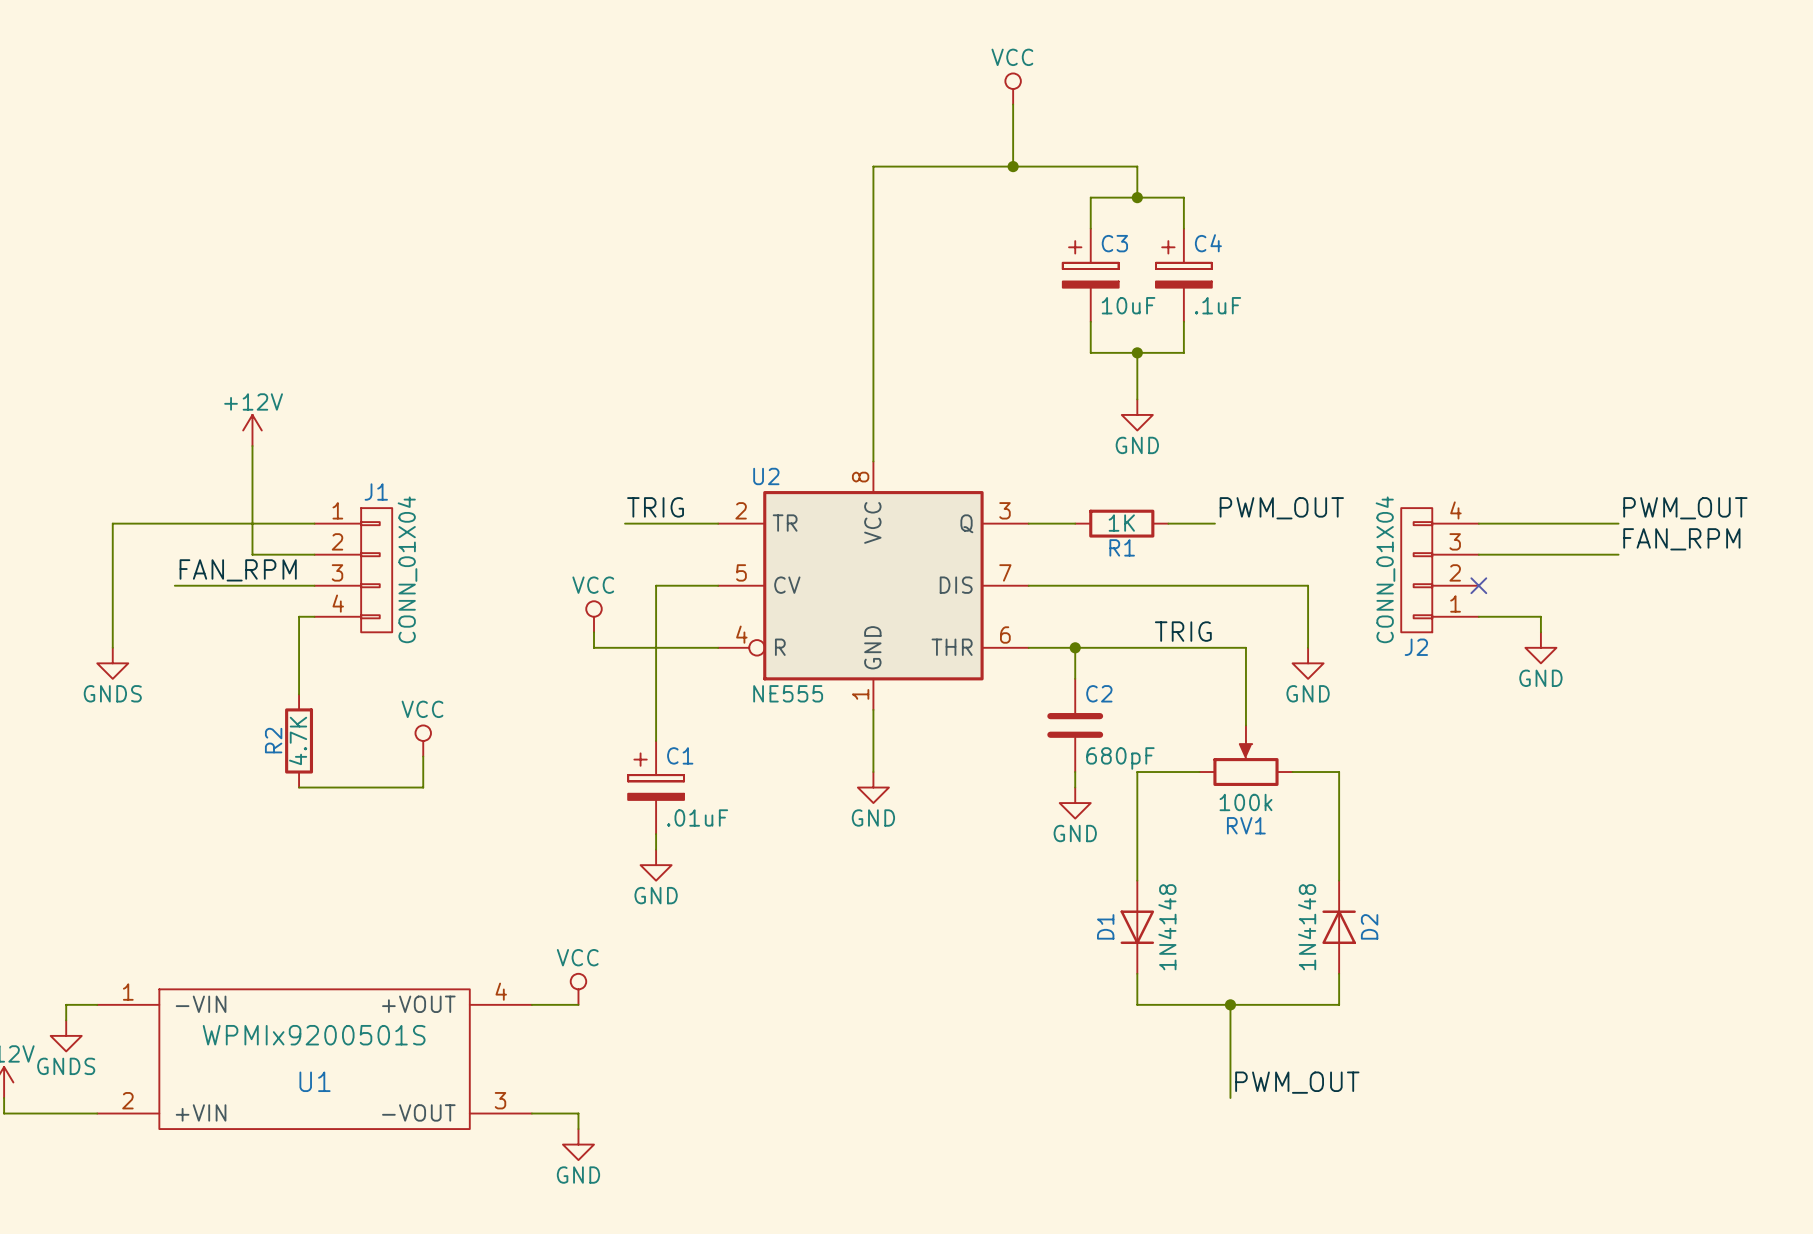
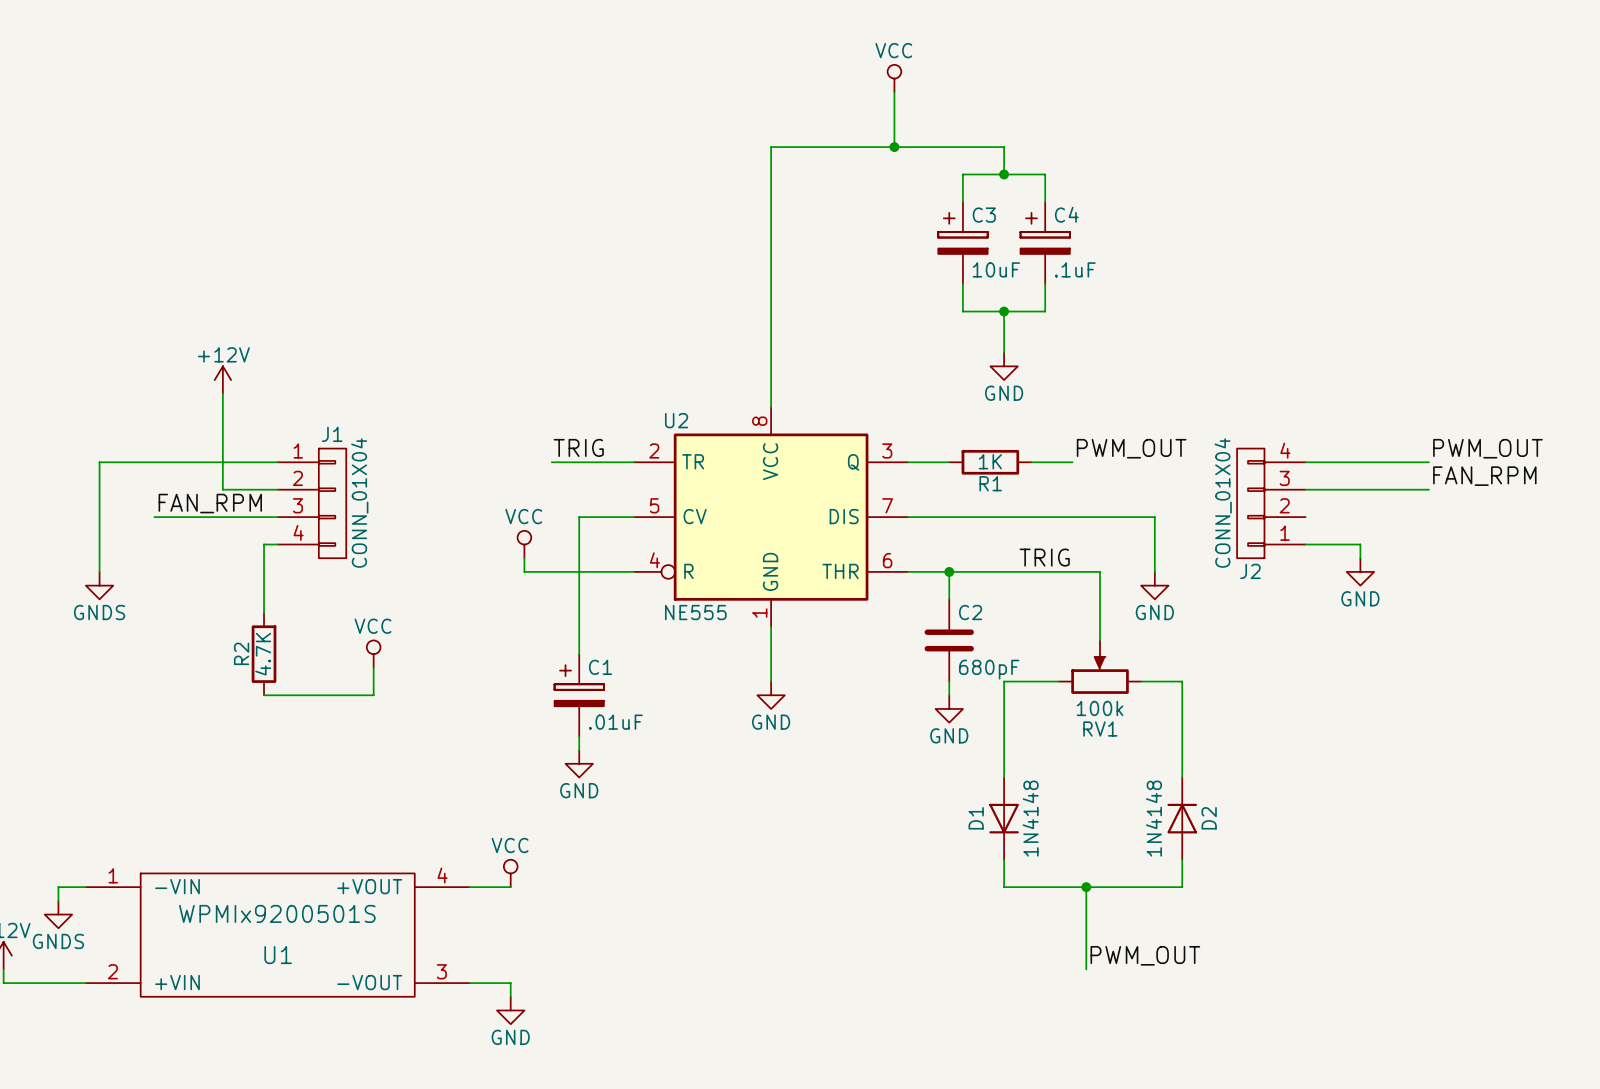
no-connect mark: (1478, 585) -> none

